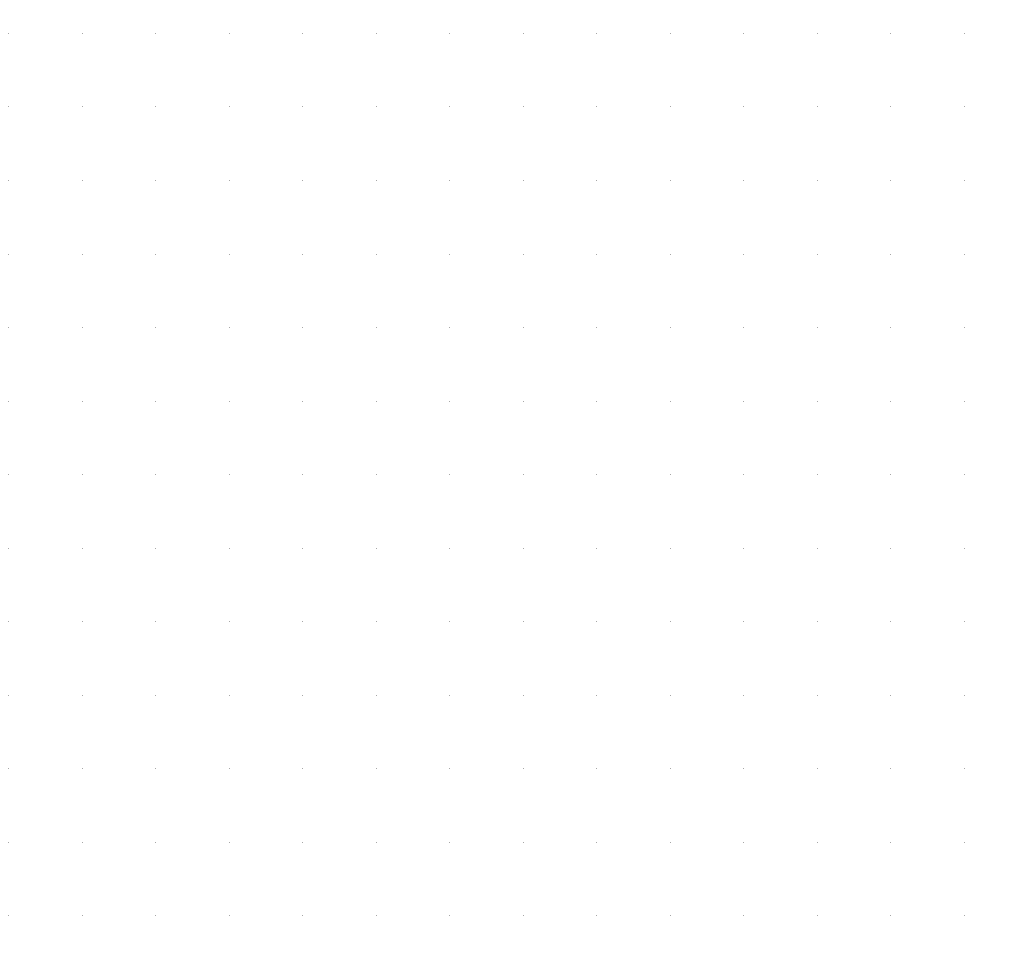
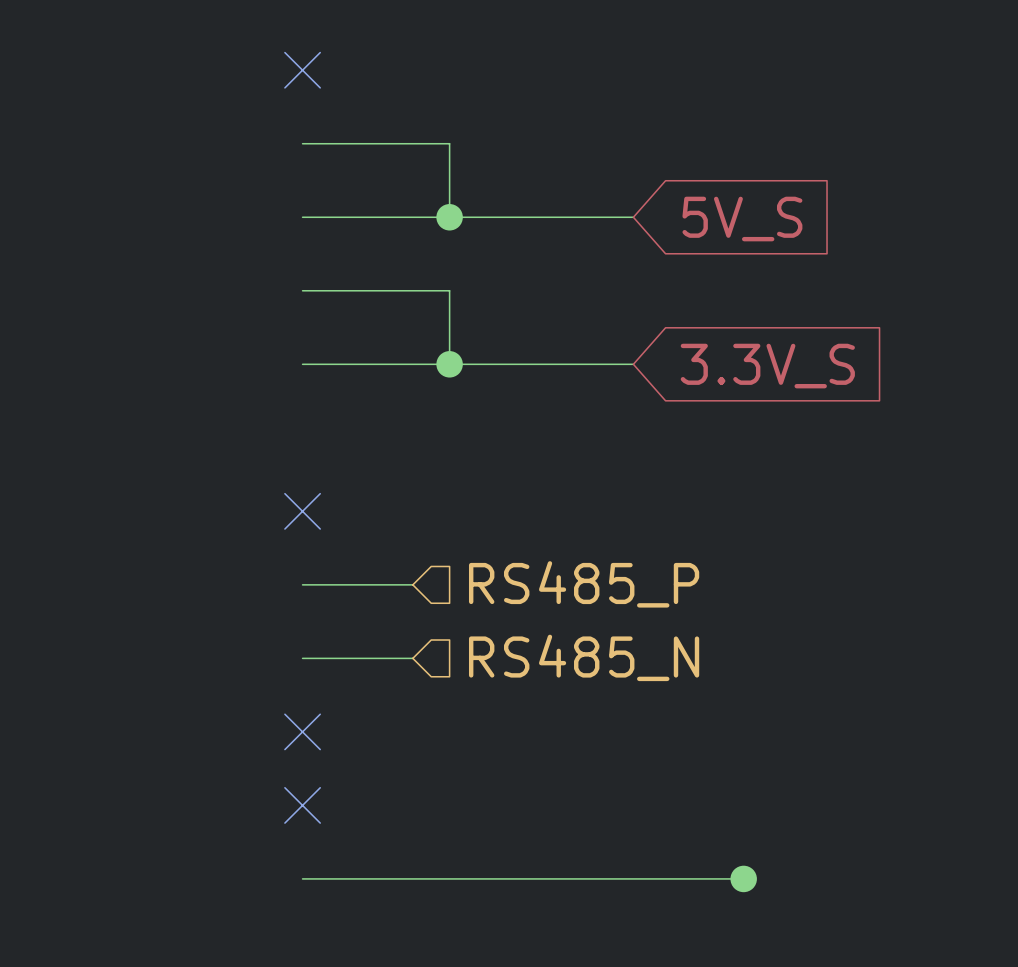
no-connect mark: none -> (302, 70)
wire: none -> (302, 143) (449, 143) (449, 217)
wire: none -> (302, 217) (633, 217)
junction: none -> (449, 217)
global label: none -> 5V_S (742, 219)
wire: none -> (302, 290) (449, 290) (449, 364)
wire: none -> (302, 364) (633, 364)
junction: none -> (449, 364)
global label: none -> 3.3V_S (767, 366)
no-connect mark: none -> (302, 511)
wire: none -> (302, 584) (412, 584)
hierarchical label: none -> RS485_P (584, 584)
hierarchical label: none -> RS485_N (584, 657)
wire: none -> (302, 658) (412, 658)
no-connect mark: none -> (302, 731)
no-connect mark: none -> (302, 805)
wire: none -> (302, 878) (743, 878)
junction: none -> (743, 878)

